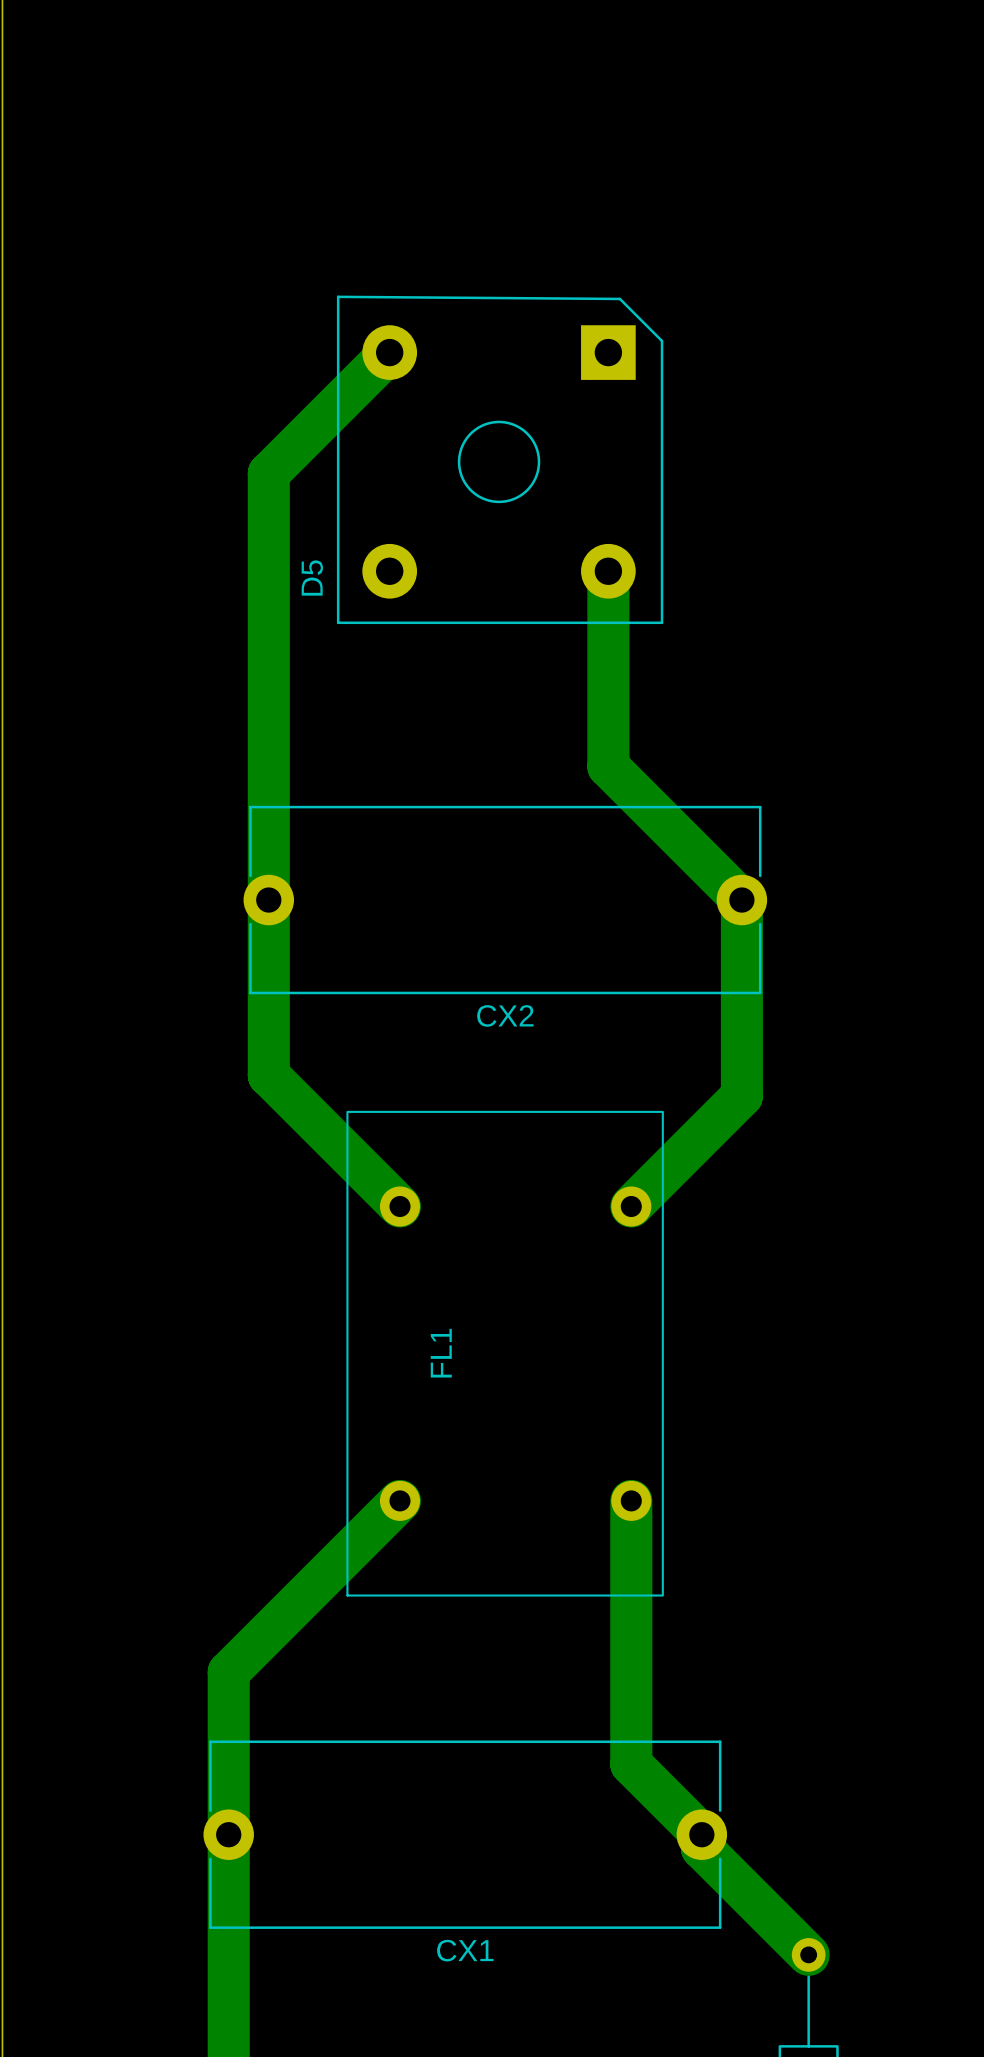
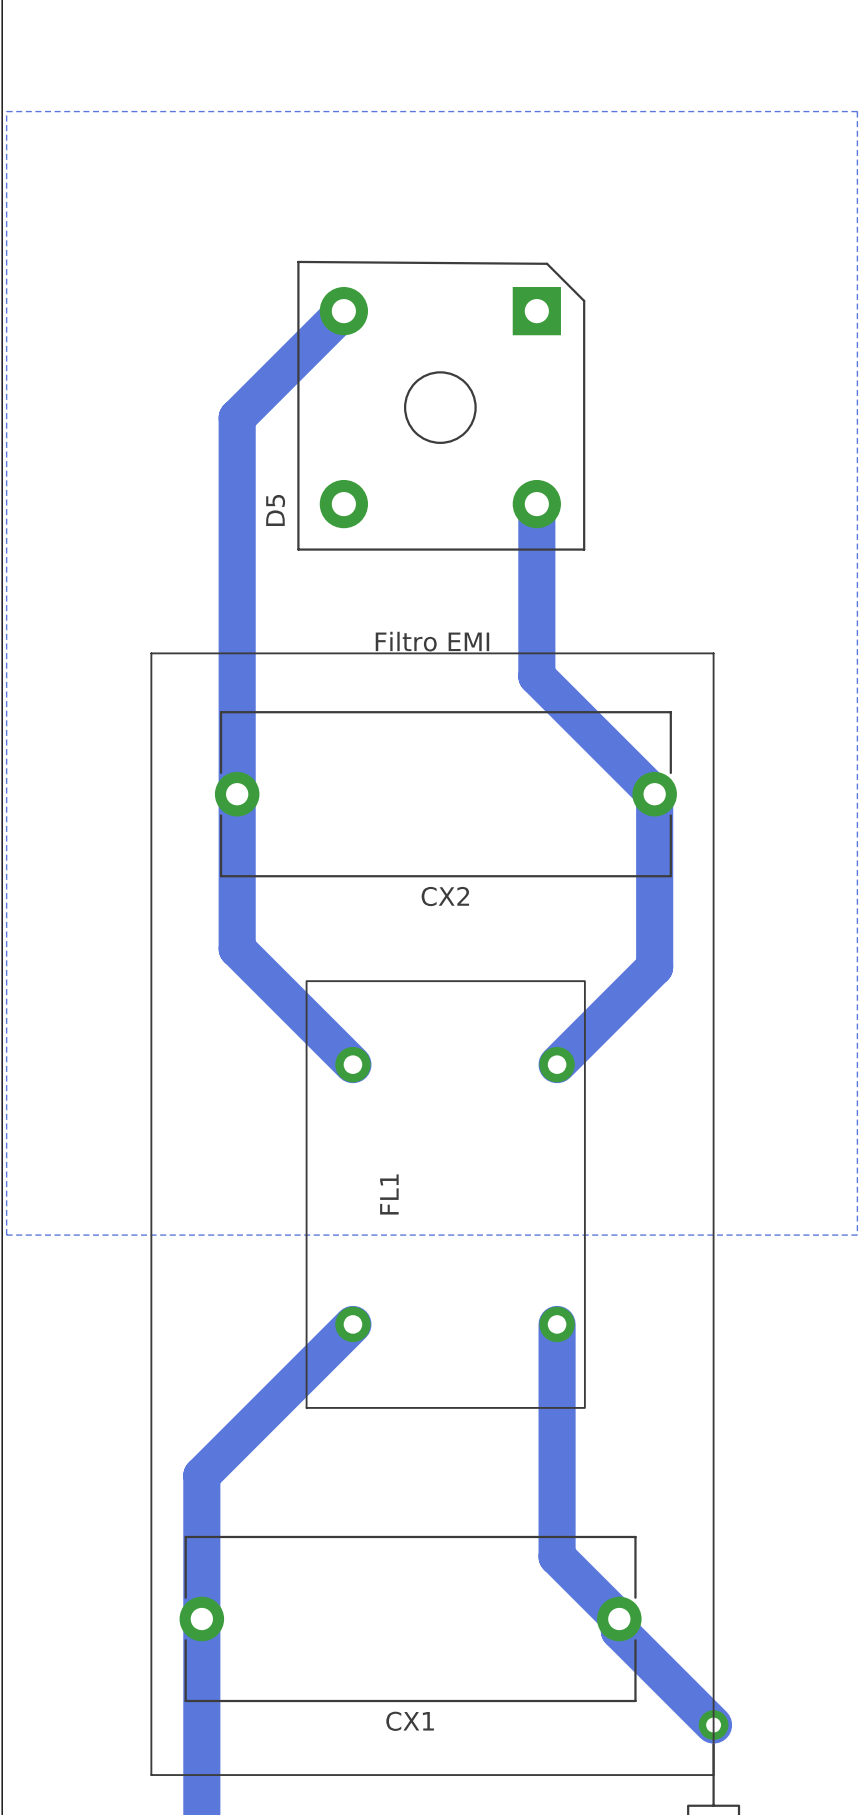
bottom zone outline: none -> (6, 111) (857, 111) (857, 1235) (6, 1235) (6, 111)
text: none -> Filtro EMI (432, 641)
line: none -> (151, 653) (713, 653) (713, 1775) (151, 1775) (151, 653)

